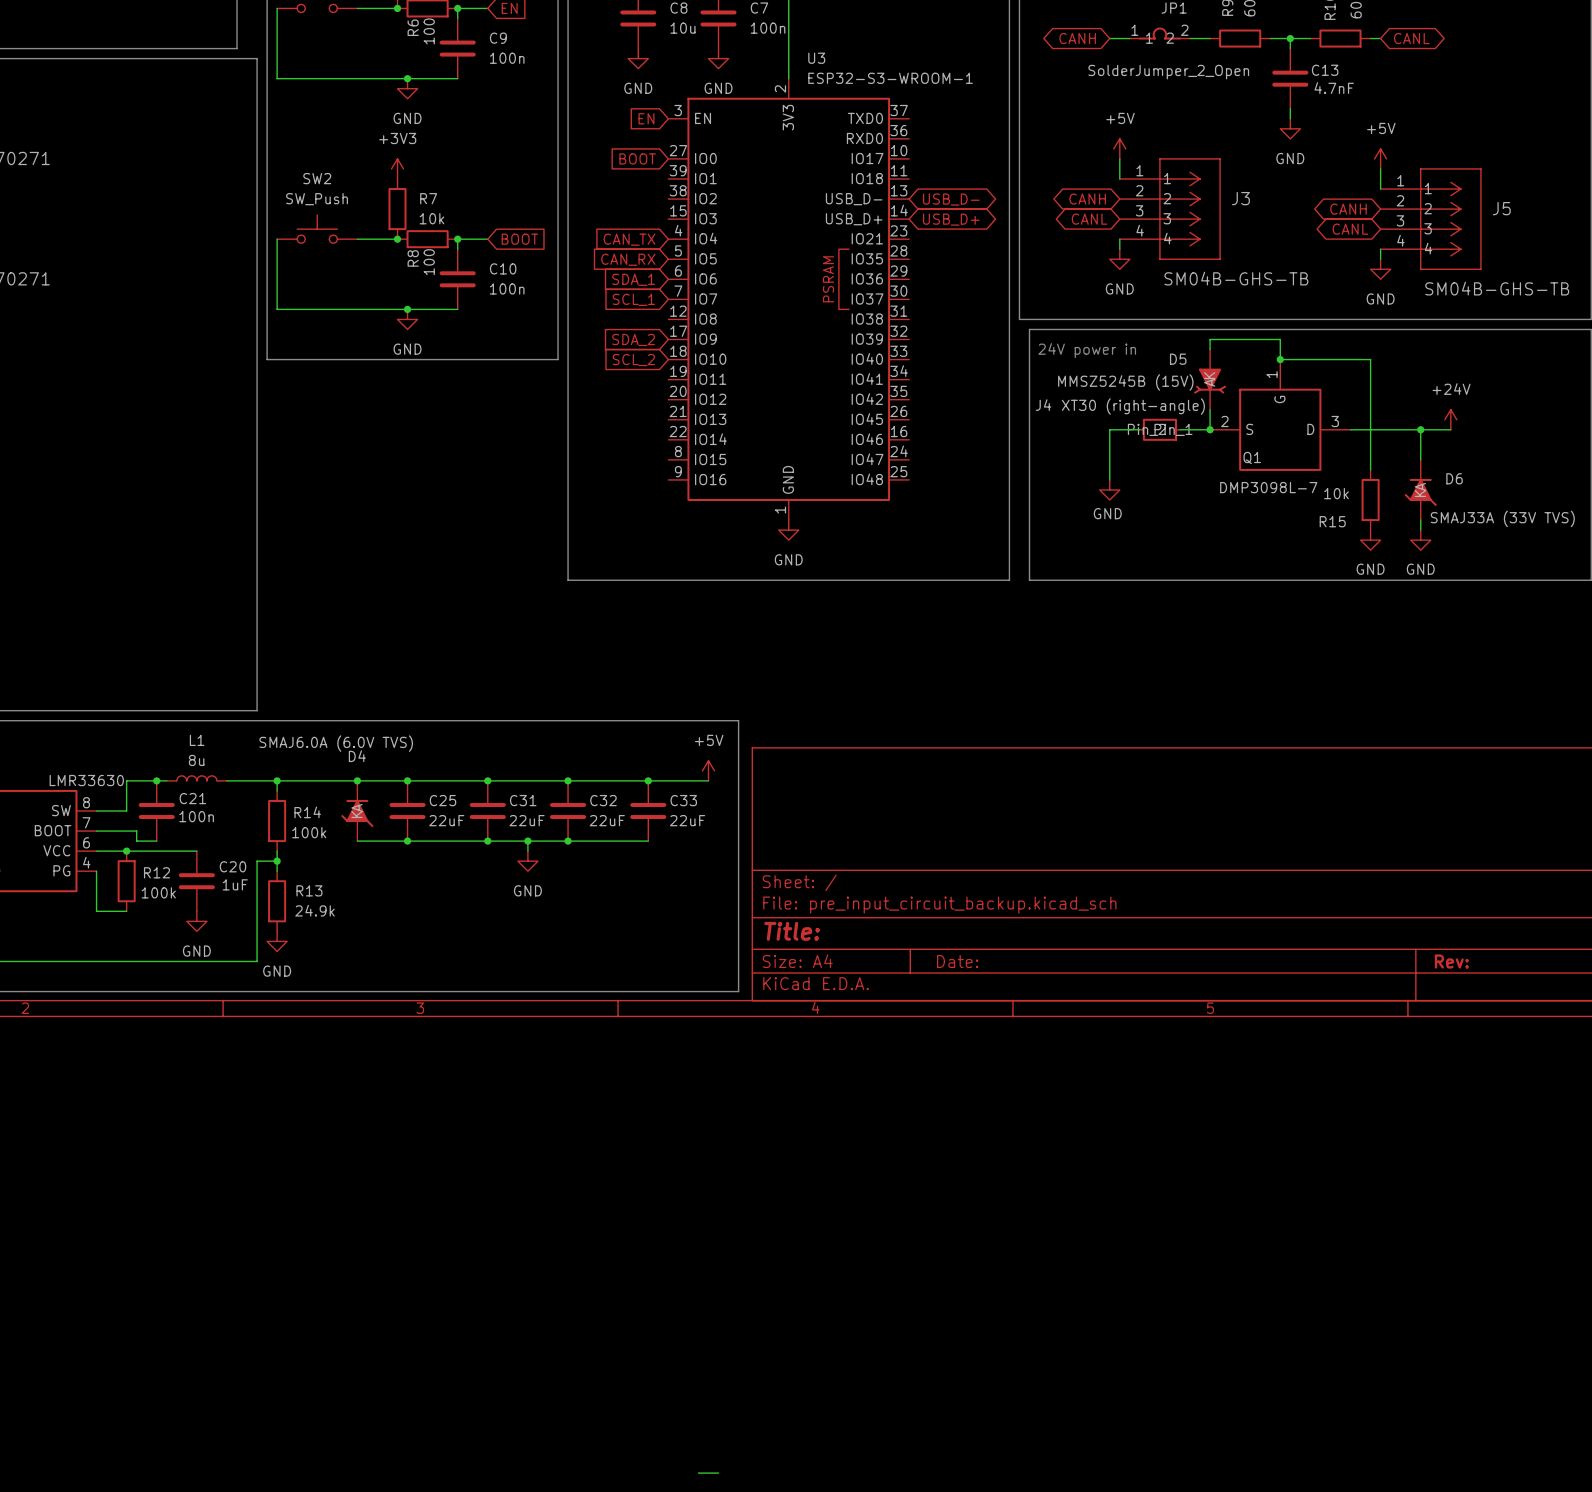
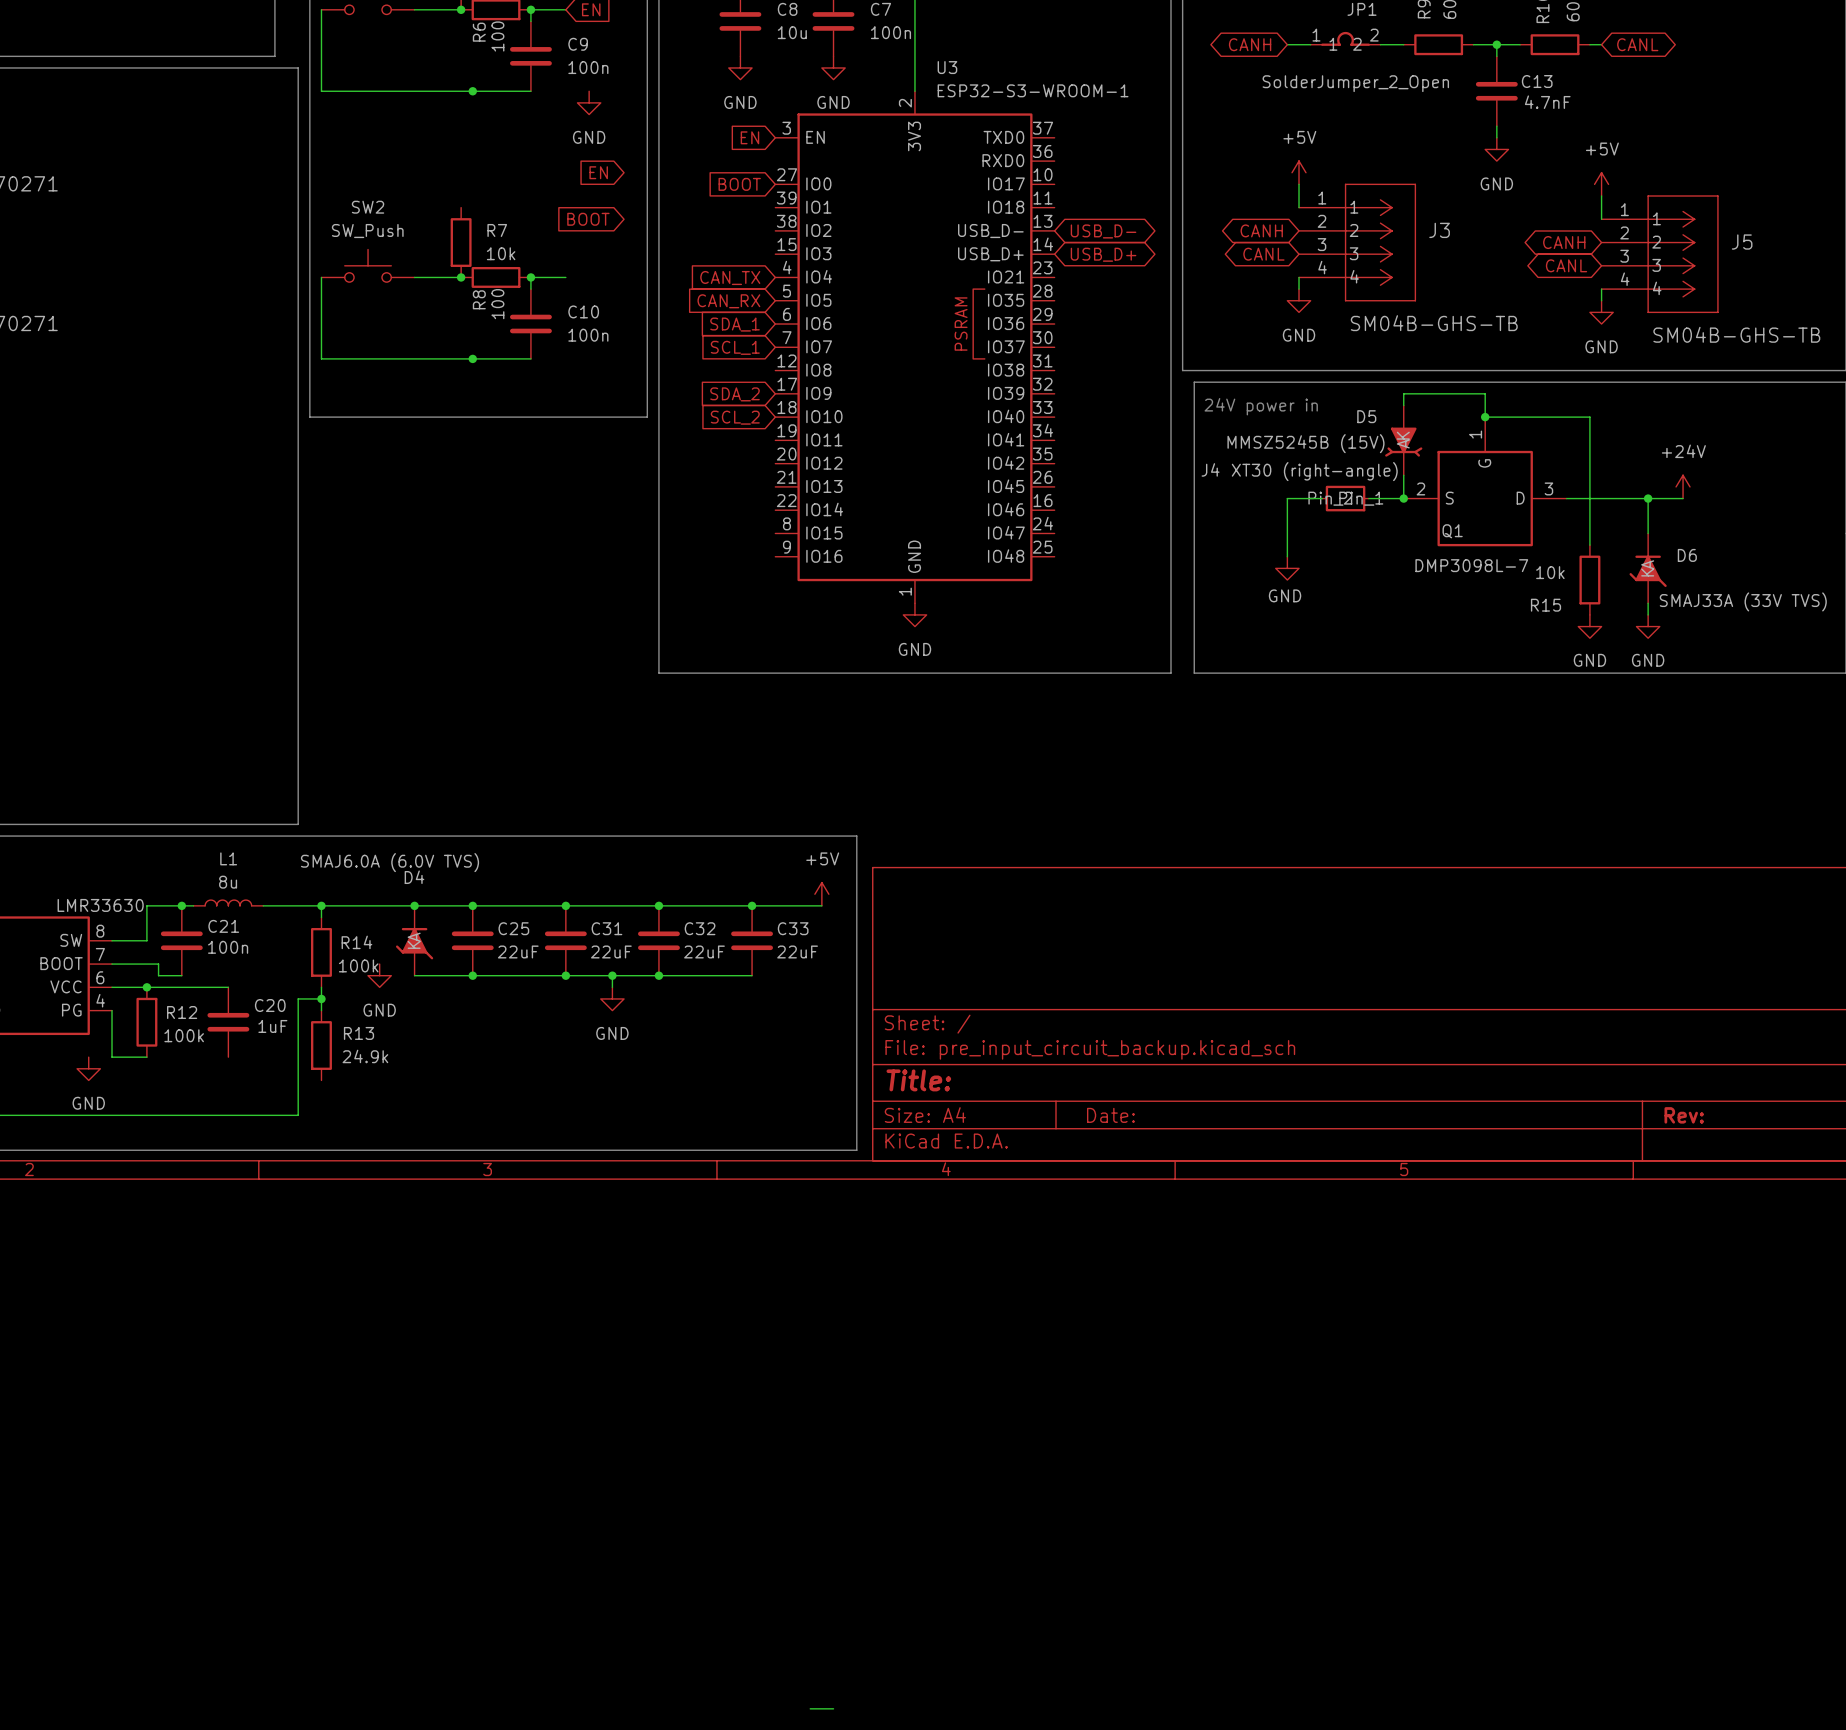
power symbol position: GND (407, 88) -> GND (589, 102)
global label: none -> EN (598, 172)
power symbol: +3V3 (397, 168) -> none
global label rotation: 0° (519, 239) -> 180° (588, 219)
power symbol: GND (407, 319) -> none
power symbol: none -> GND (379, 975)
power symbol: none -> GND (88, 1068)
power symbol: GND (196, 921) -> none
power symbol: GND (277, 941) -> none

